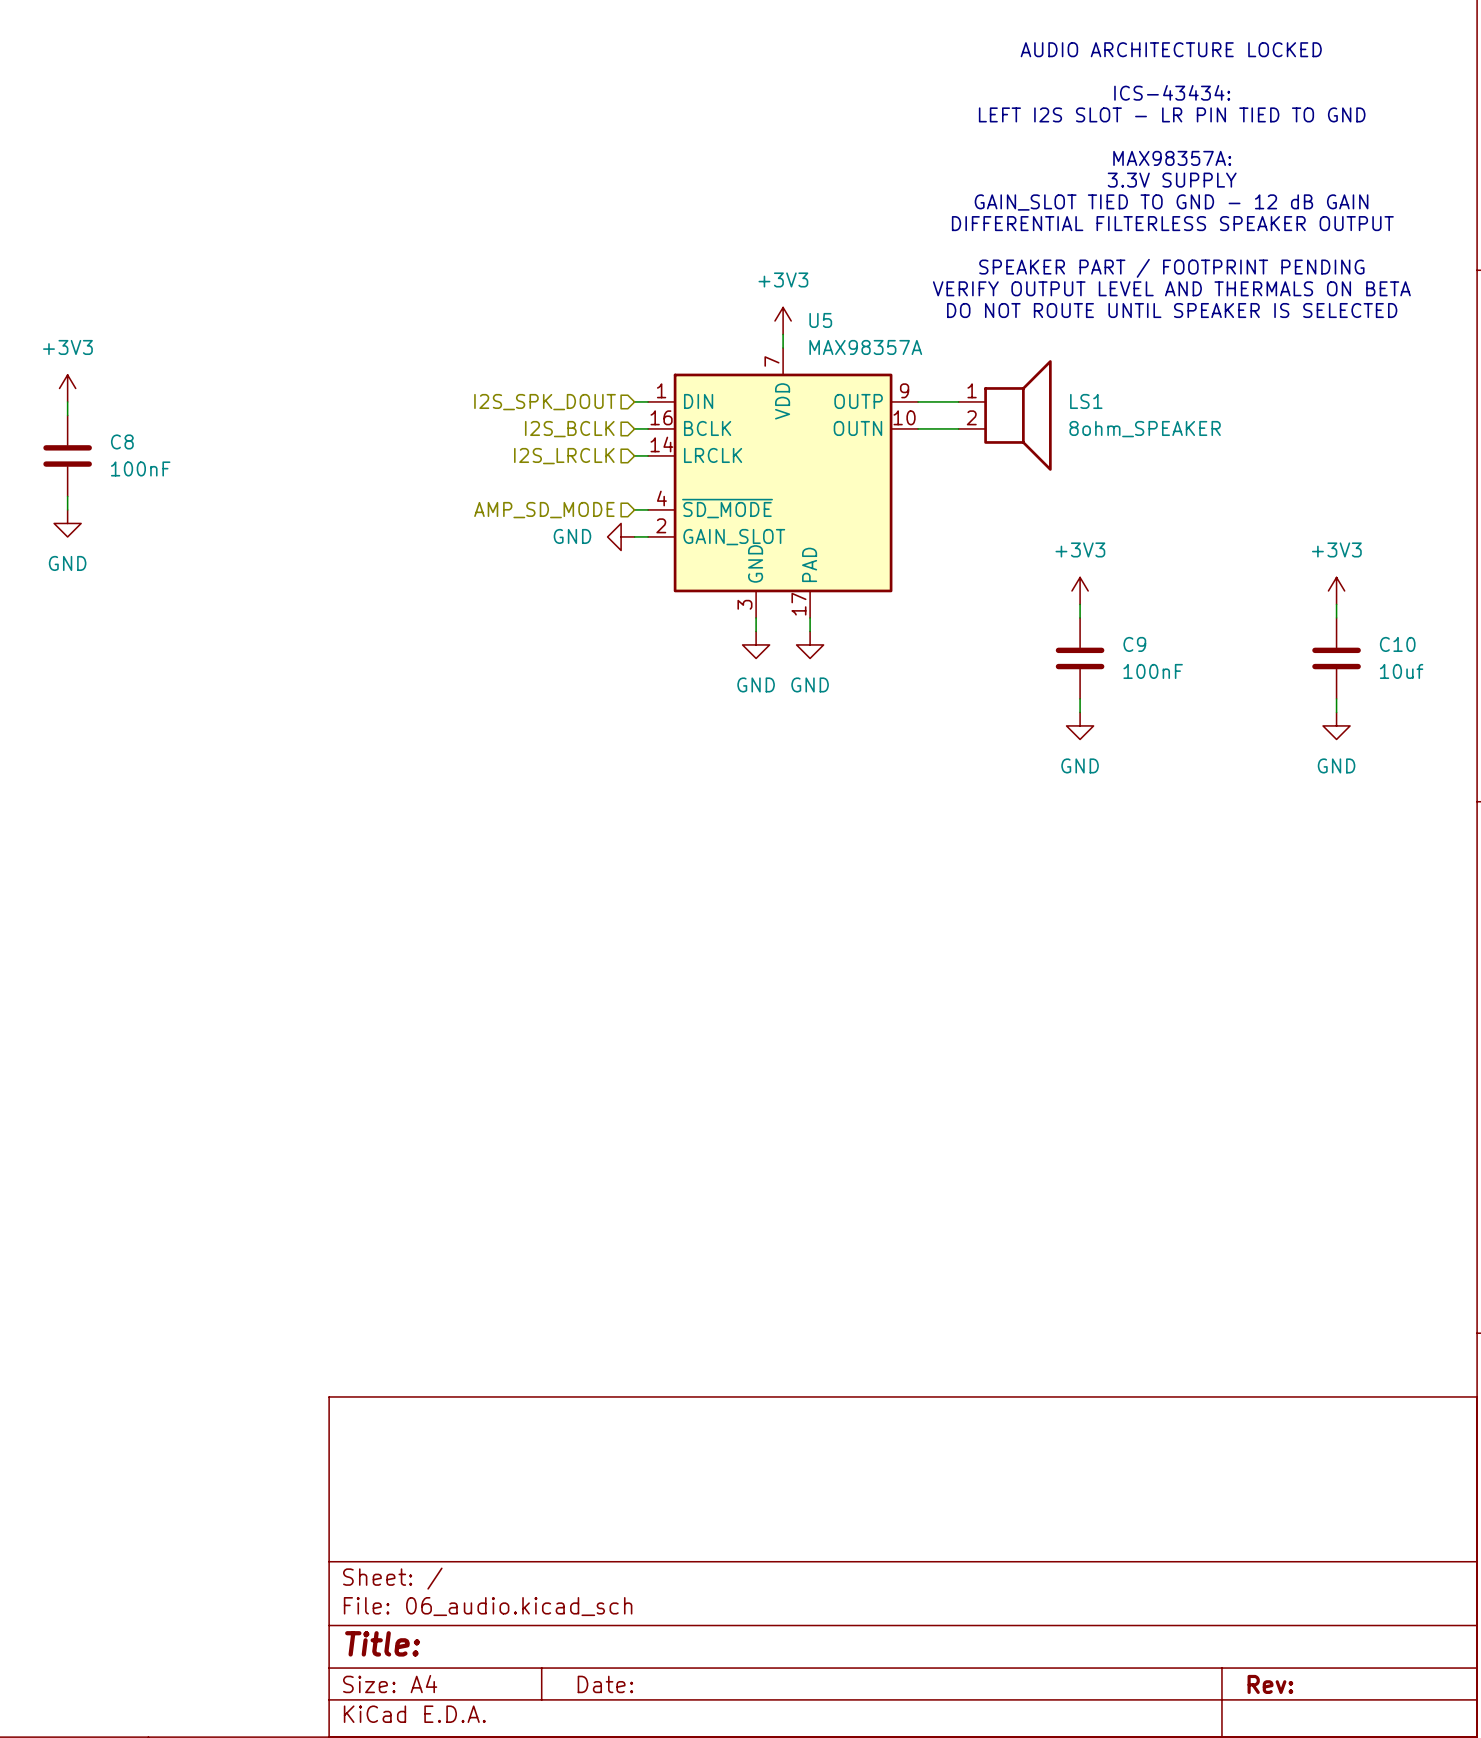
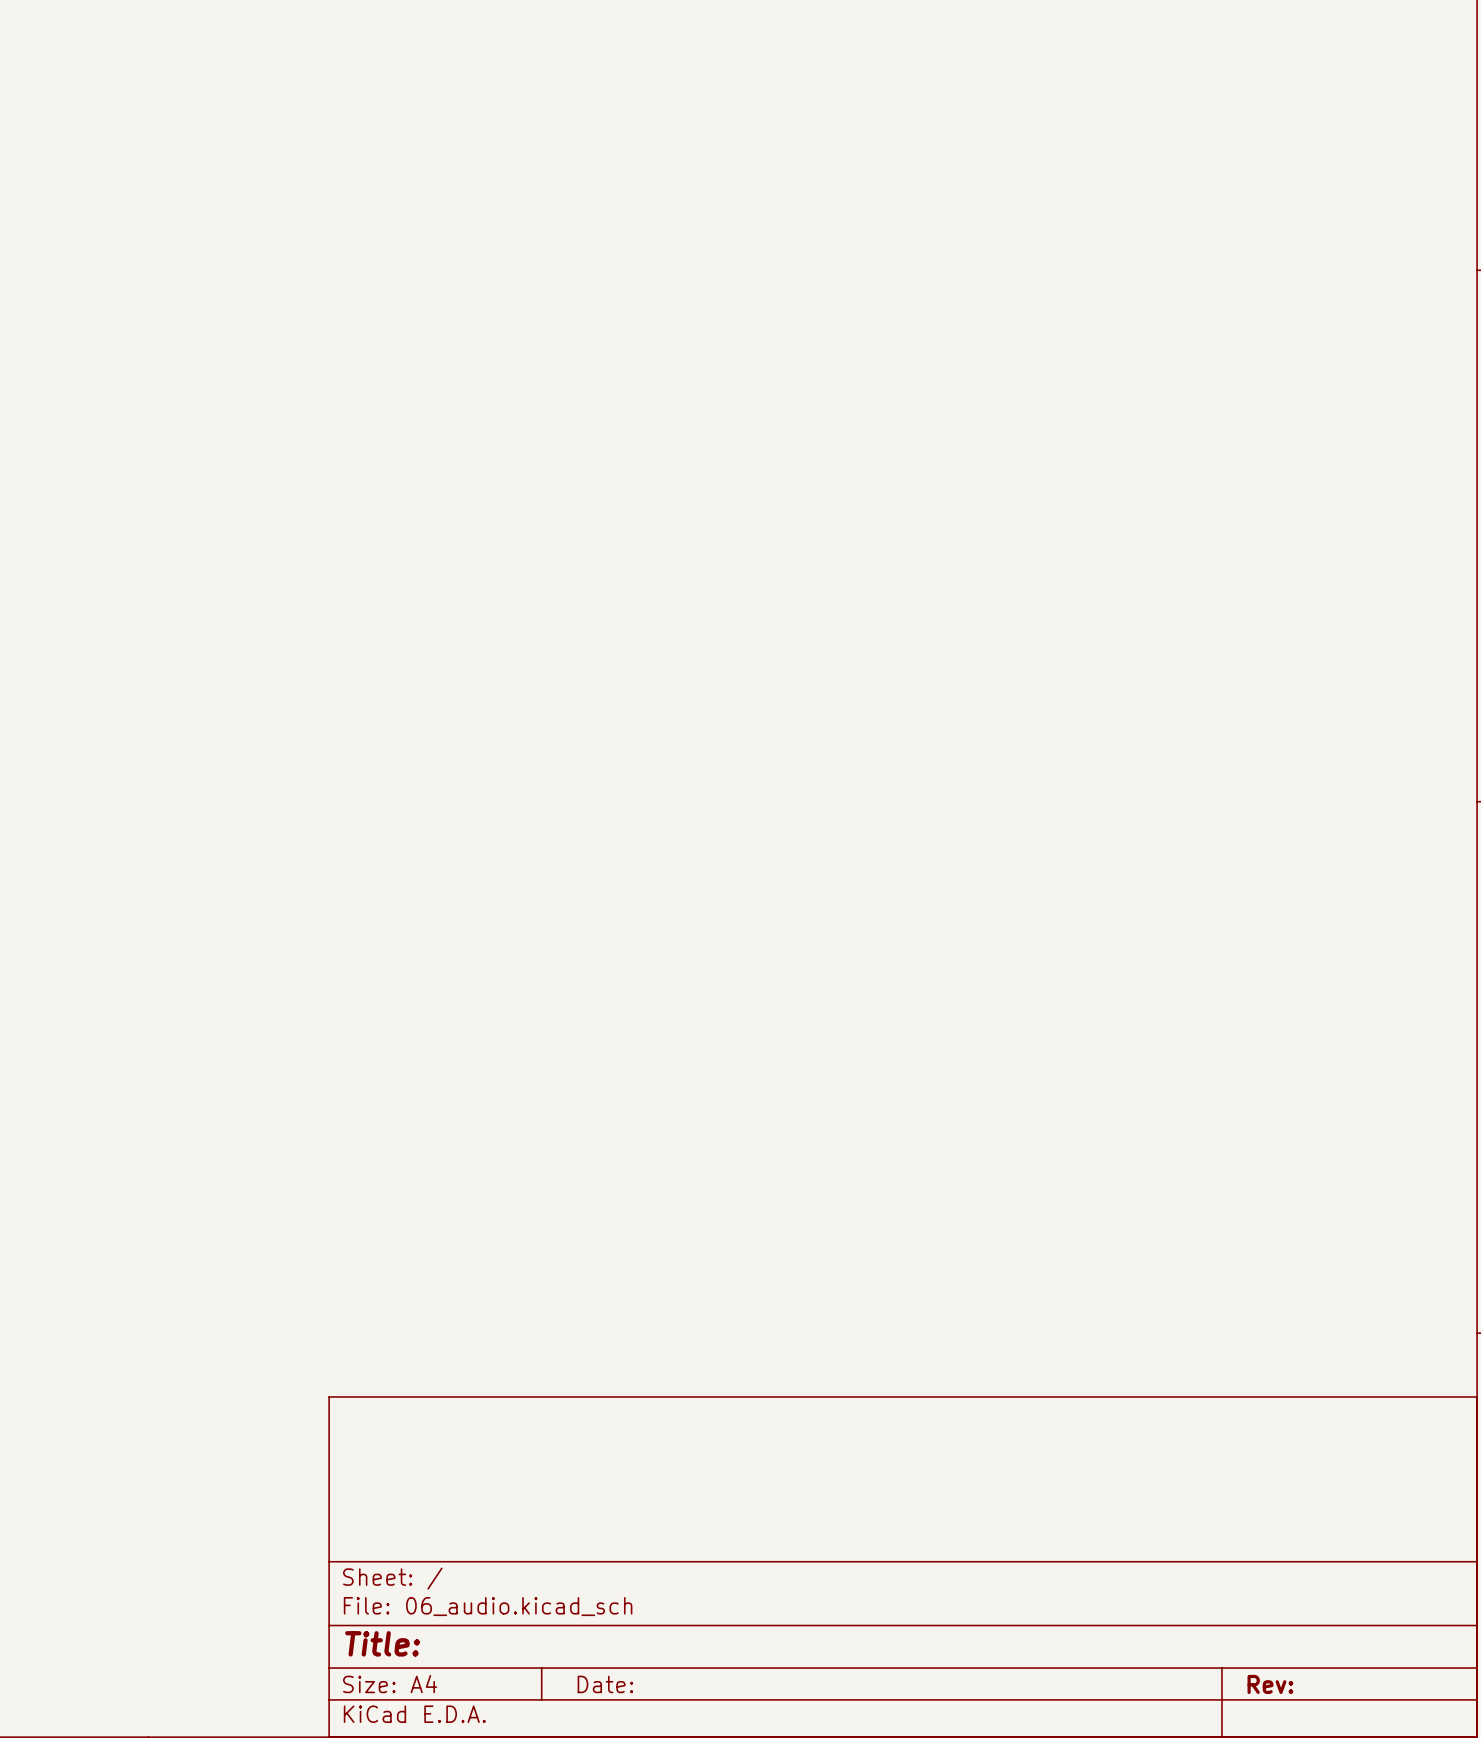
text: AUDIO ARCHITECTURE LOCKED (1171, 49) -> none
text: ICS-43434: (1172, 92) -> none
text: LEFT I2S SLOT - LR PIN TIED TO GND (1172, 114) -> none
text: MAX98357A: (1172, 158) -> none
text: 3.3V SUPPLY (1172, 180) -> none
text: GAIN_SLOT TIED TO GND - 12 dB GAIN (1171, 202) -> none
text: DIFFERENTIAL FILTERLESS SPEAKER OUTPUT (1172, 223) -> none
text: SPEAKER PART / FOOTPRINT PENDING (1171, 268) -> none
text: VERIFY OUTPUT LEVEL AND THERMALS ON BETA (1171, 288) -> none
text: DO NOT ROUTE UNTIL SPEAKER IS SELECTED (1172, 310) -> none
power symbol: +3V3 (783, 320) -> none
wire: (783, 334) (783, 347) -> none
power symbol: +3V3 (67, 388) -> none
wire: (67, 401) (67, 415) -> none
wire: (634, 401) (648, 401) -> none
wire: (918, 401) (958, 401) -> none
hierarchical label: I2S_SPK_DOUT (545, 402) -> none
LS1: 8ohm_SPEAKER (1005, 415) -> none
wire: (634, 428) (648, 428) -> none
wire: (918, 428) (958, 428) -> none
hierarchical label: I2S_BCLK (569, 429) -> none
C8: 100nF (67, 455) -> none
wire: (634, 455) (648, 455) -> none
hierarchical label: I2S_LRCLK (564, 456) -> none
U5: MAX98357A (783, 482) -> none
wire: (67, 496) (67, 509) -> none
wire: (634, 509) (648, 509) -> none
hierarchical label: AMP_SD_MODE (544, 510) -> none
power symbol: GND (67, 523) -> none
power symbol: GND (621, 536) -> none
wire: (634, 536) (648, 536) -> none
power symbol: +3V3 (1080, 590) -> none
power symbol: +3V3 (1336, 590) -> none
wire: (1080, 604) (1080, 617) -> none
wire: (1336, 604) (1336, 617) -> none
wire: (756, 617) (756, 631) -> none
wire: (810, 617) (810, 631) -> none
power symbol: GND (756, 644) -> none
power symbol: GND (810, 644) -> none
C9: 100nF (1080, 658) -> none
C10: 10uf (1336, 658) -> none
wire: (1080, 698) (1080, 712) -> none
wire: (1336, 698) (1336, 712) -> none
power symbol: GND (1080, 725) -> none
power symbol: GND (1336, 725) -> none

